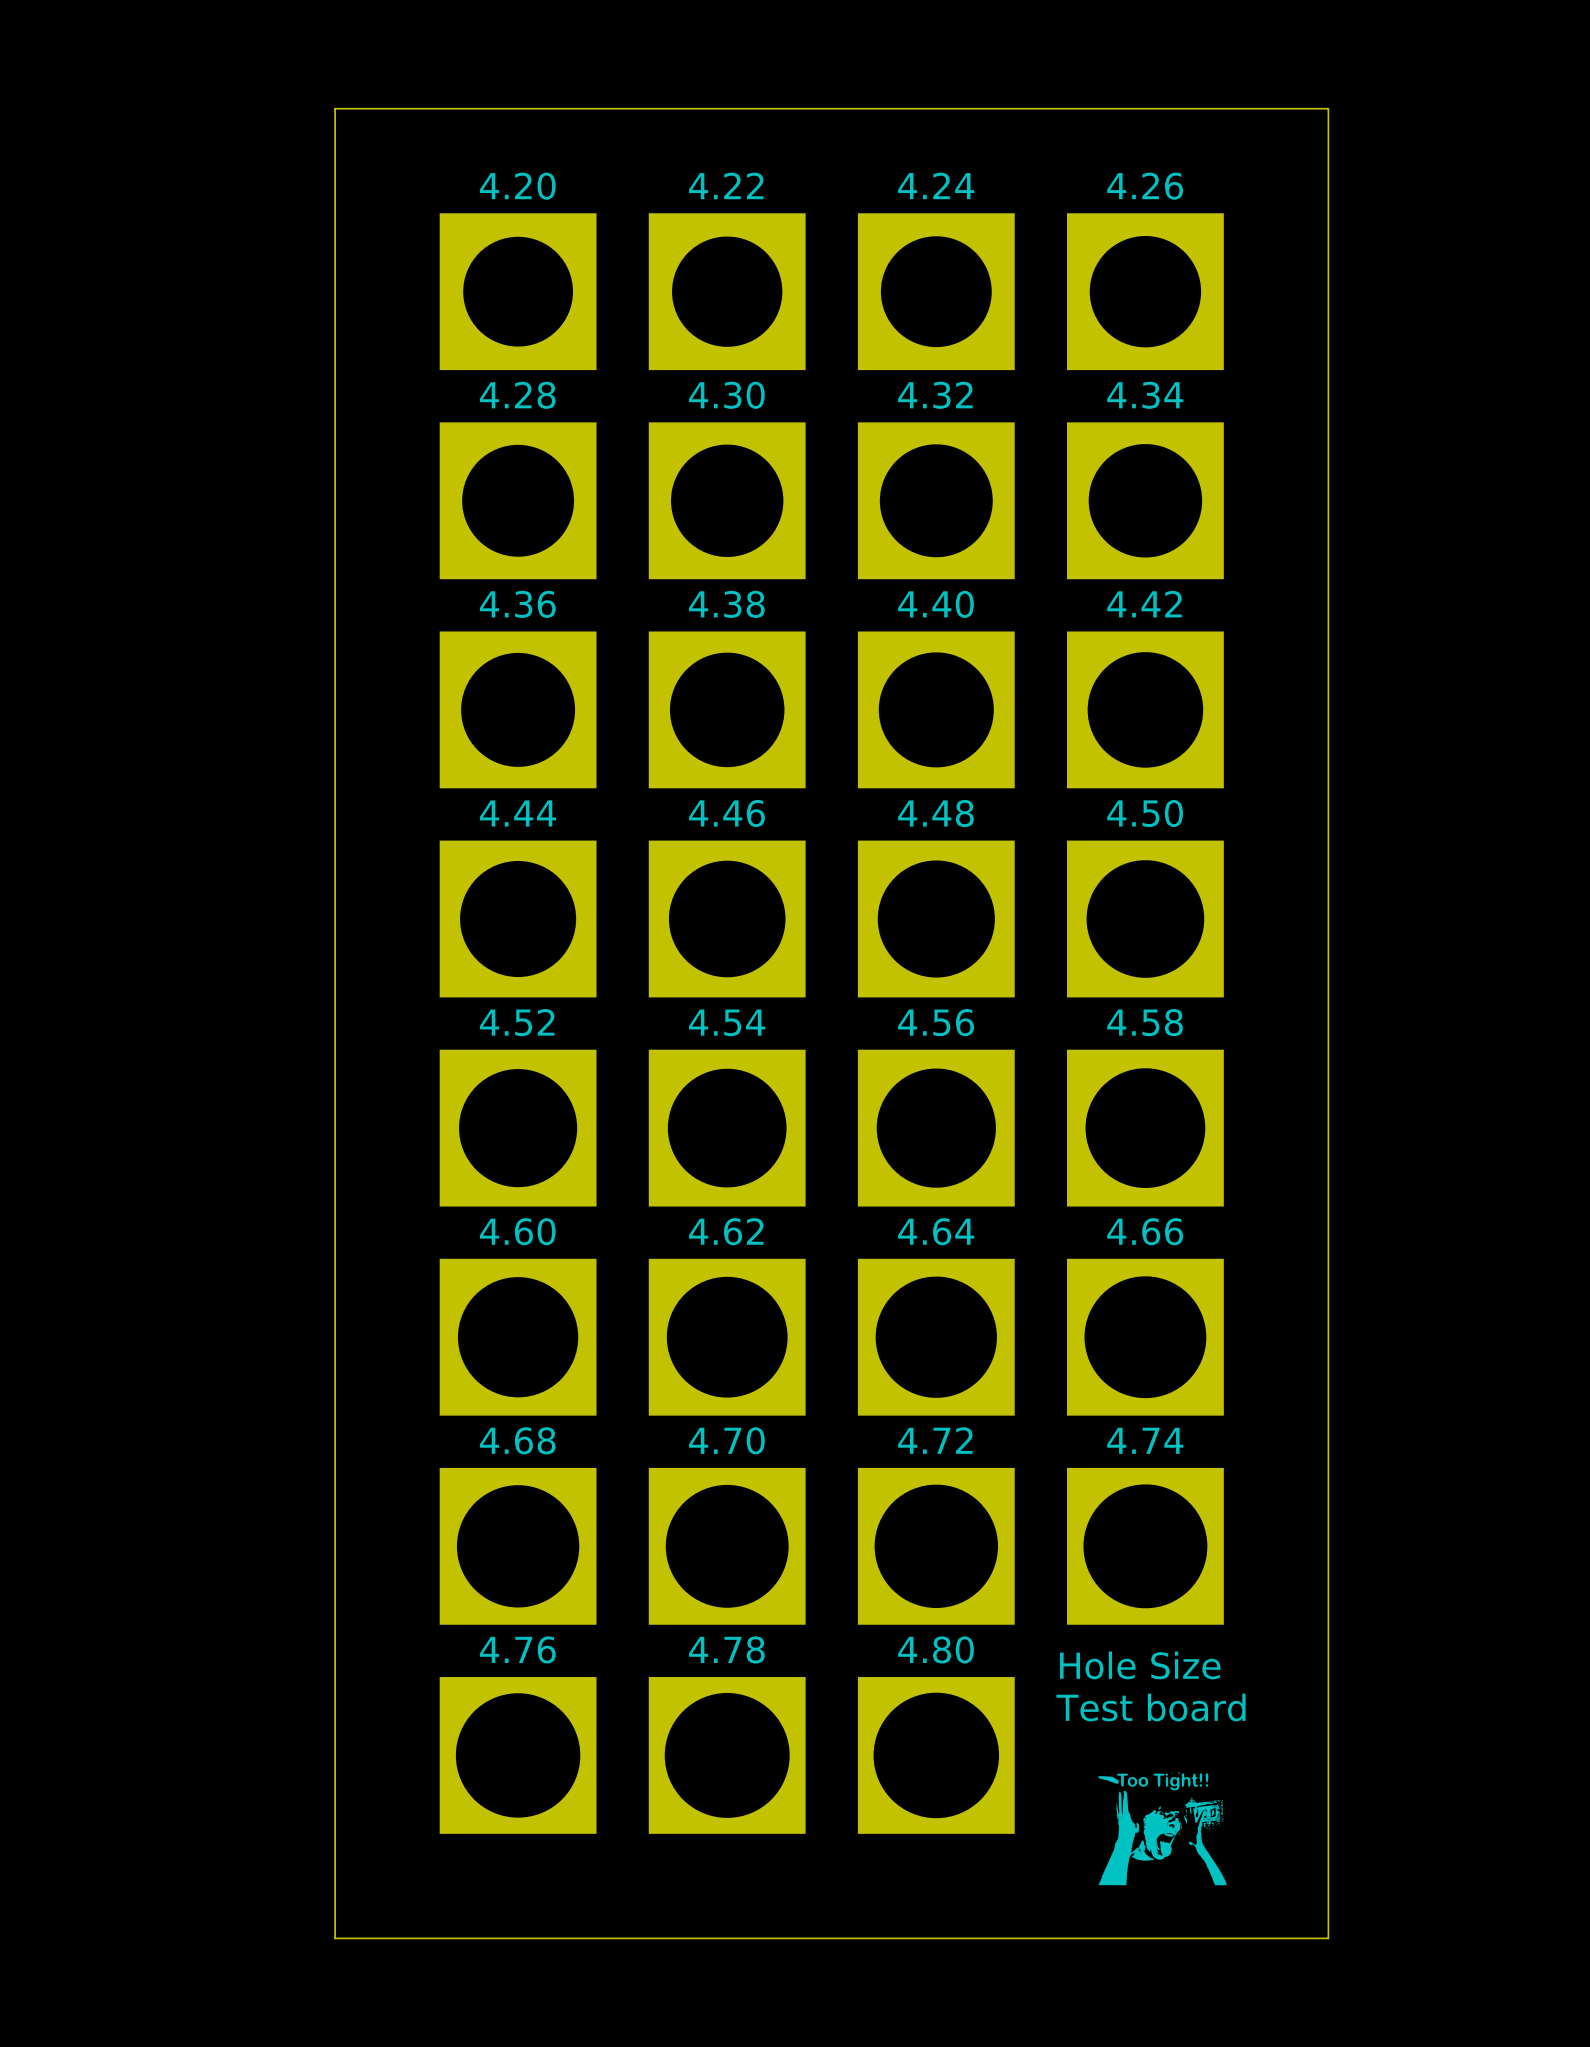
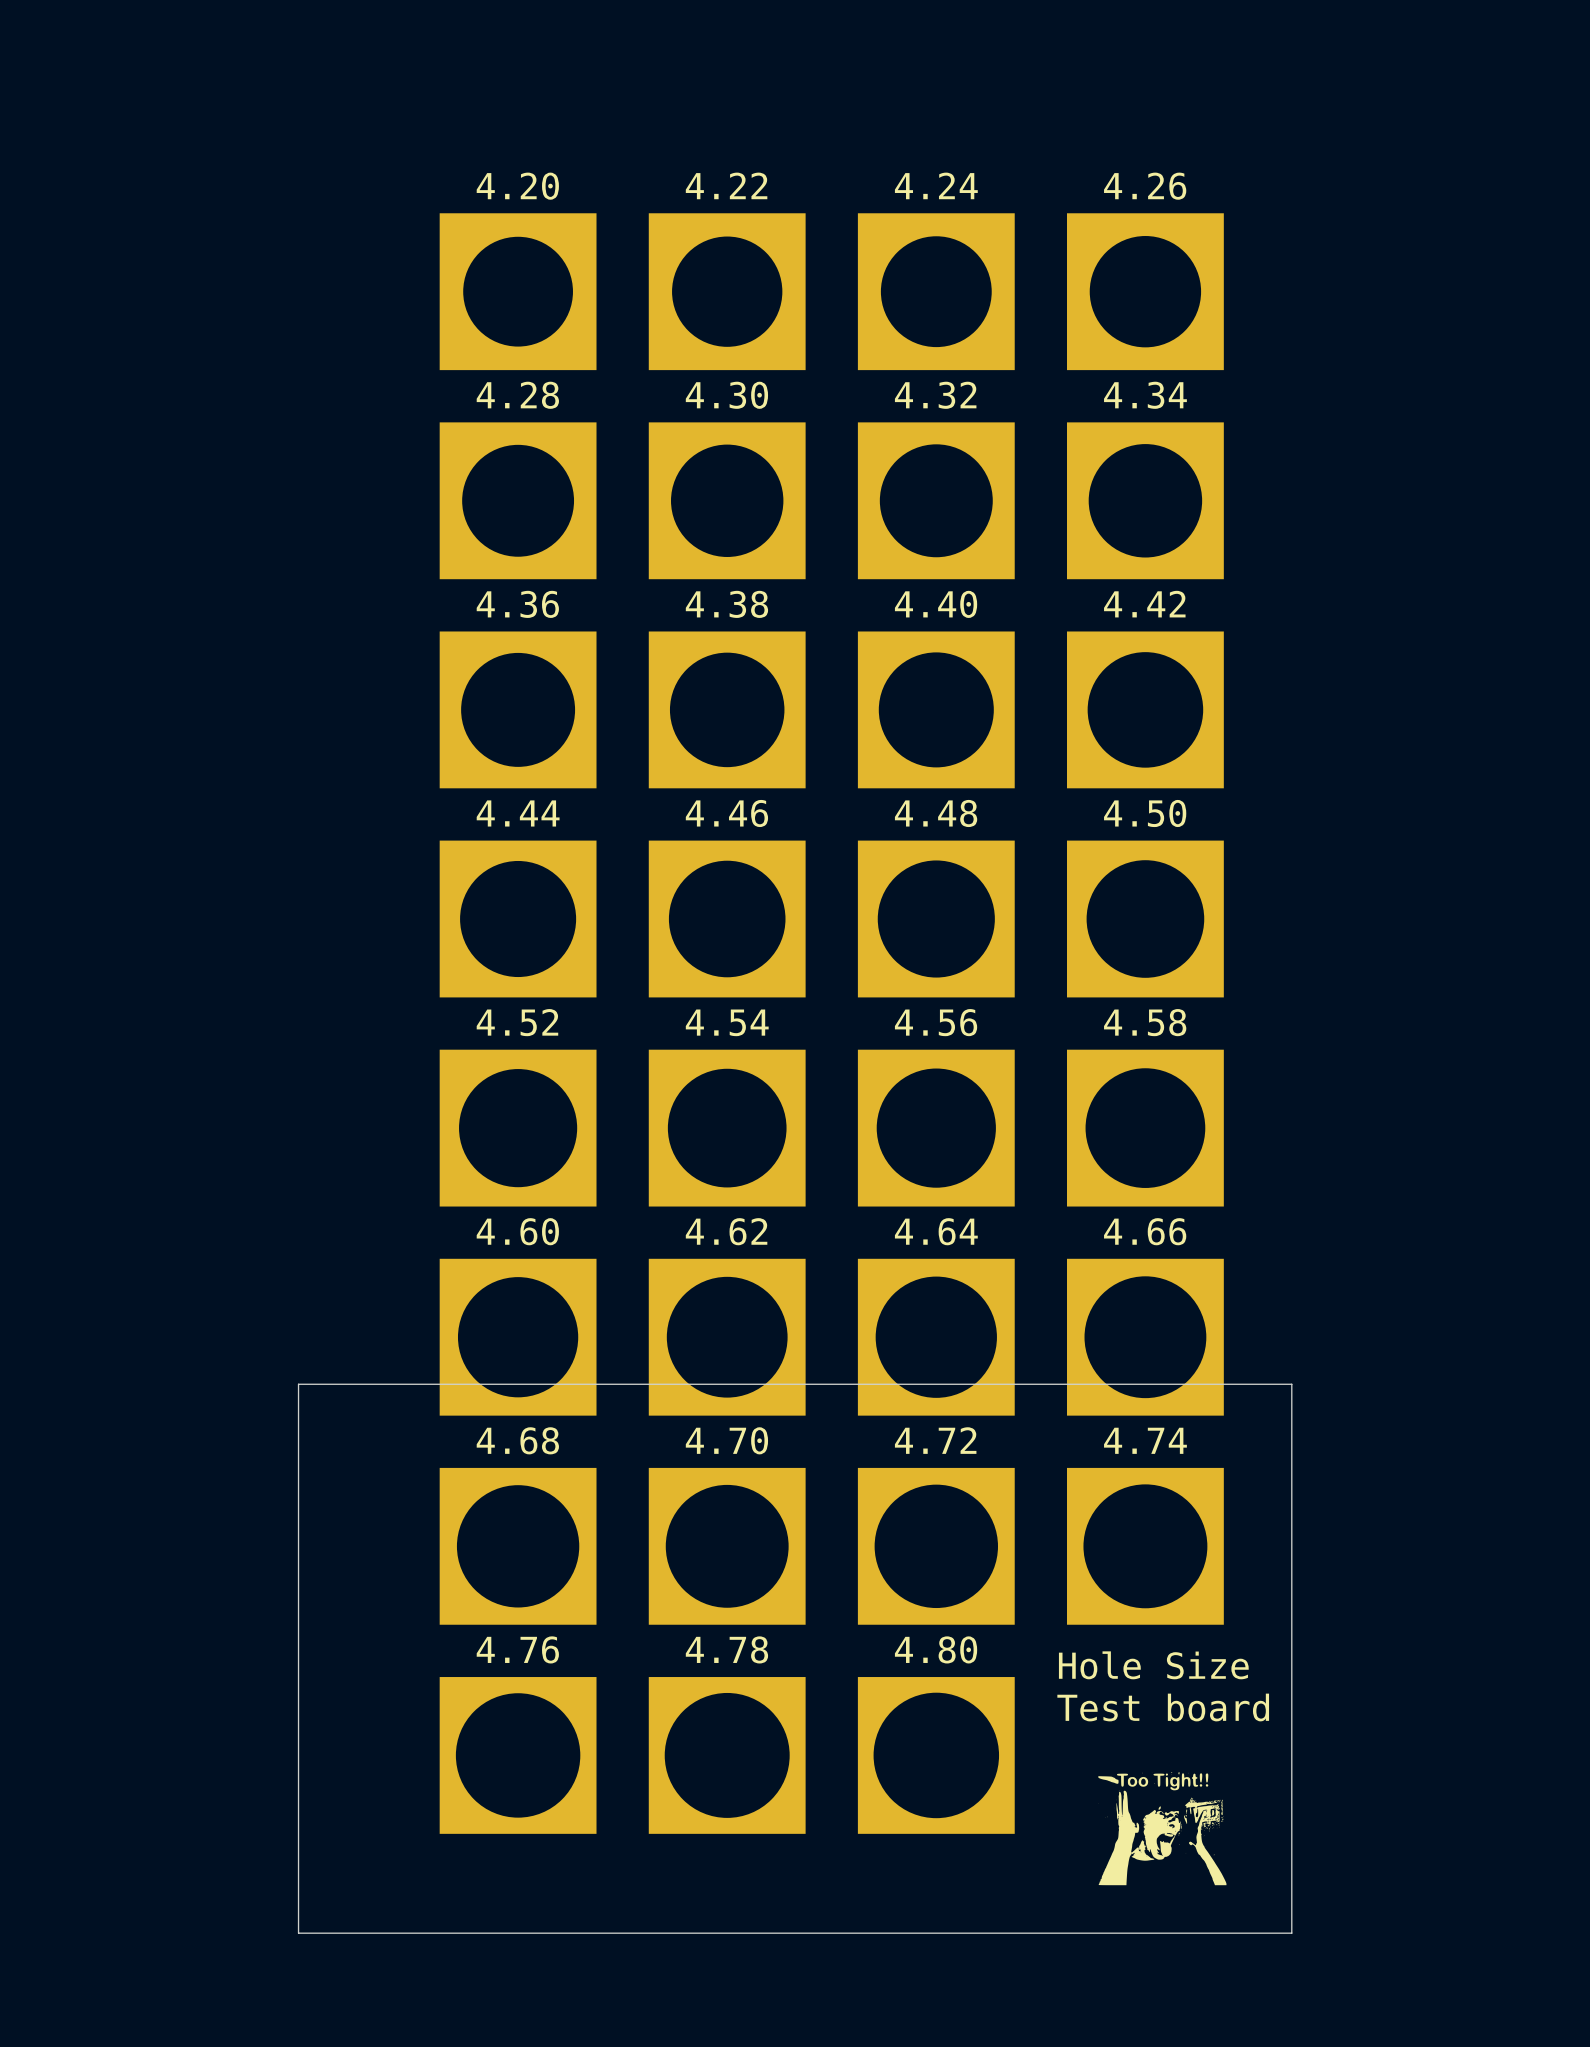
board edge: (335, 108) (1328, 108) (1328, 1938) (335, 1938) (335, 108) -> none
board edge: none -> (298, 1384) (1291, 1384) (1291, 1933) (298, 1933) (298, 1384)

